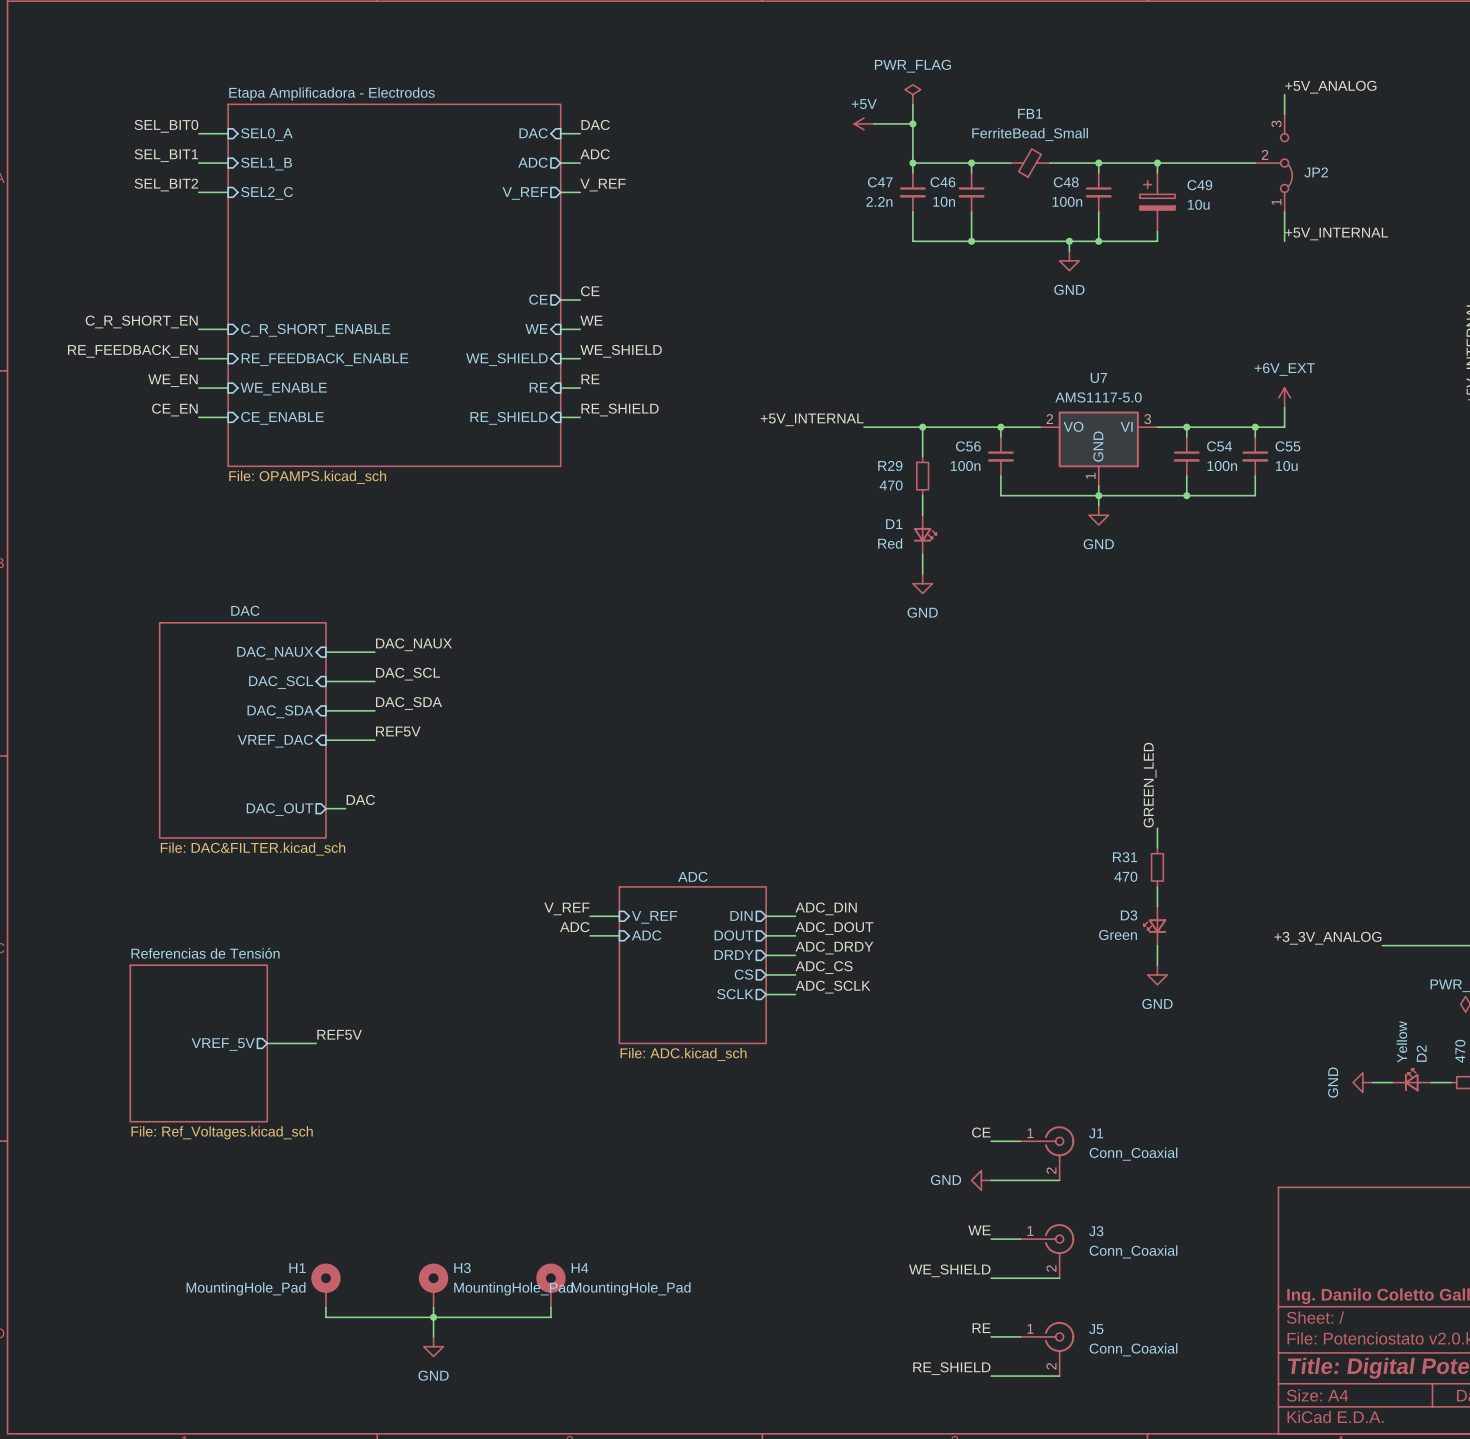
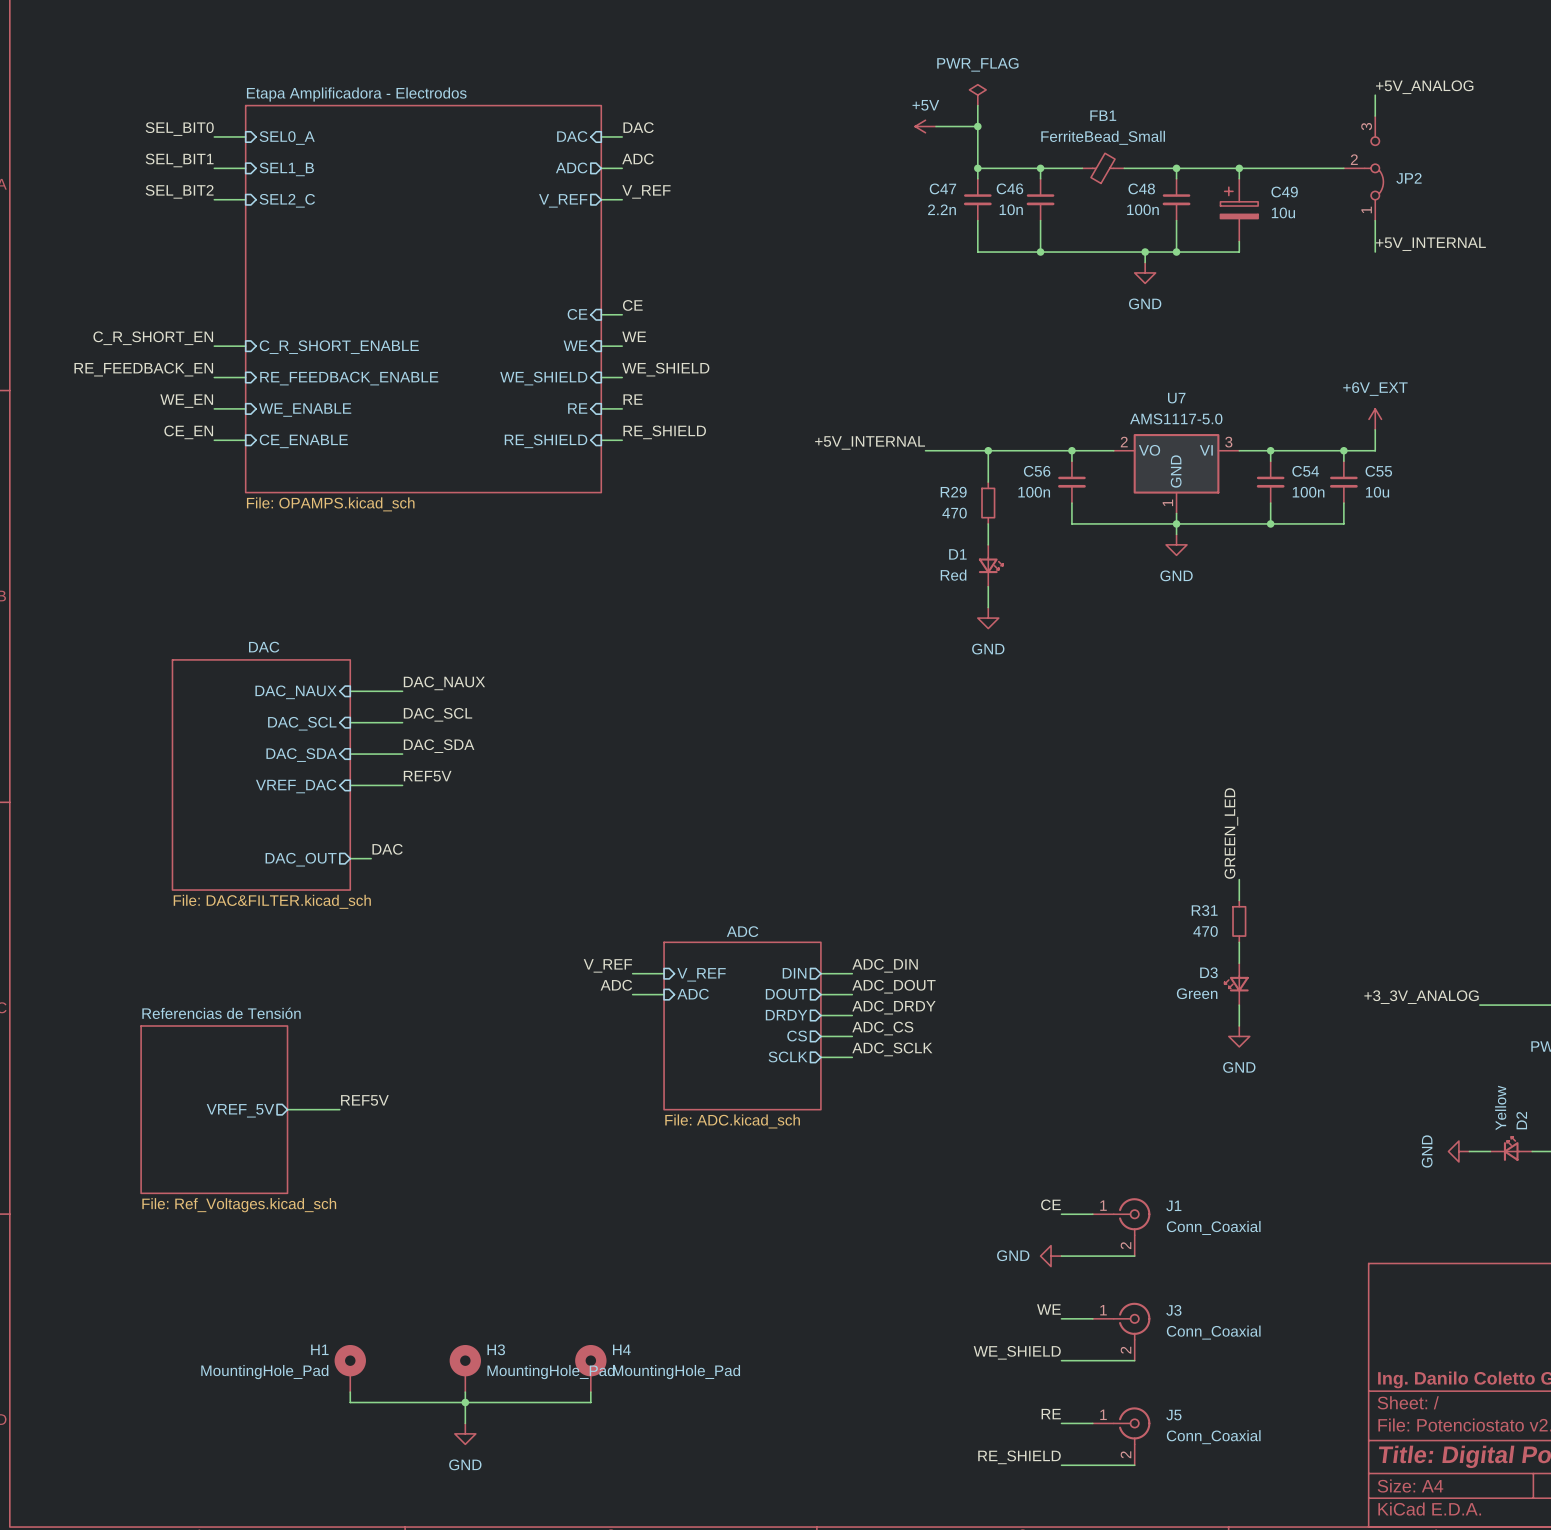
sheet pin shape: output (538, 299) -> input (577, 314)

